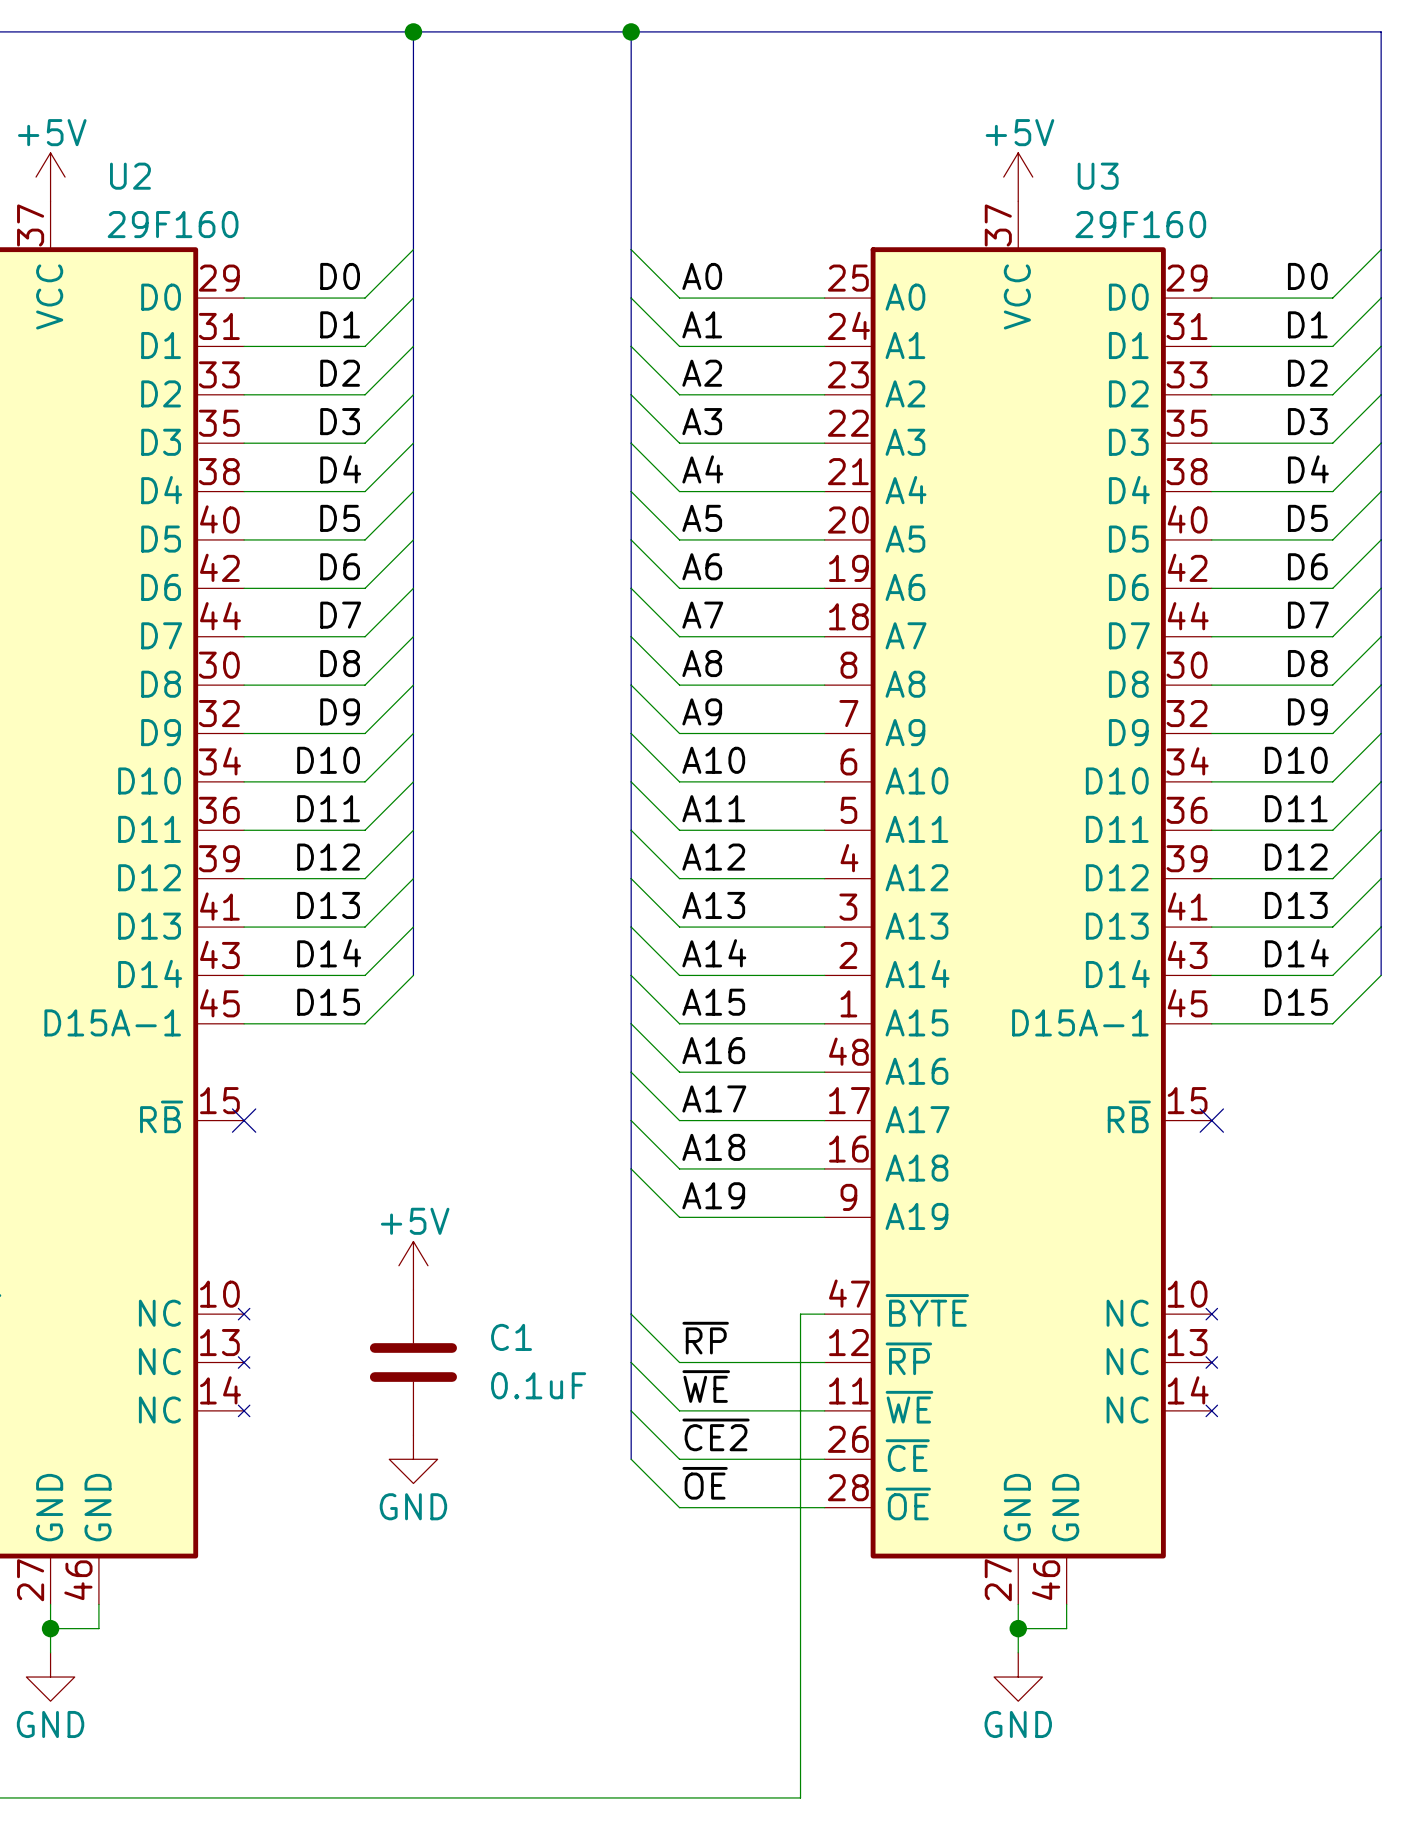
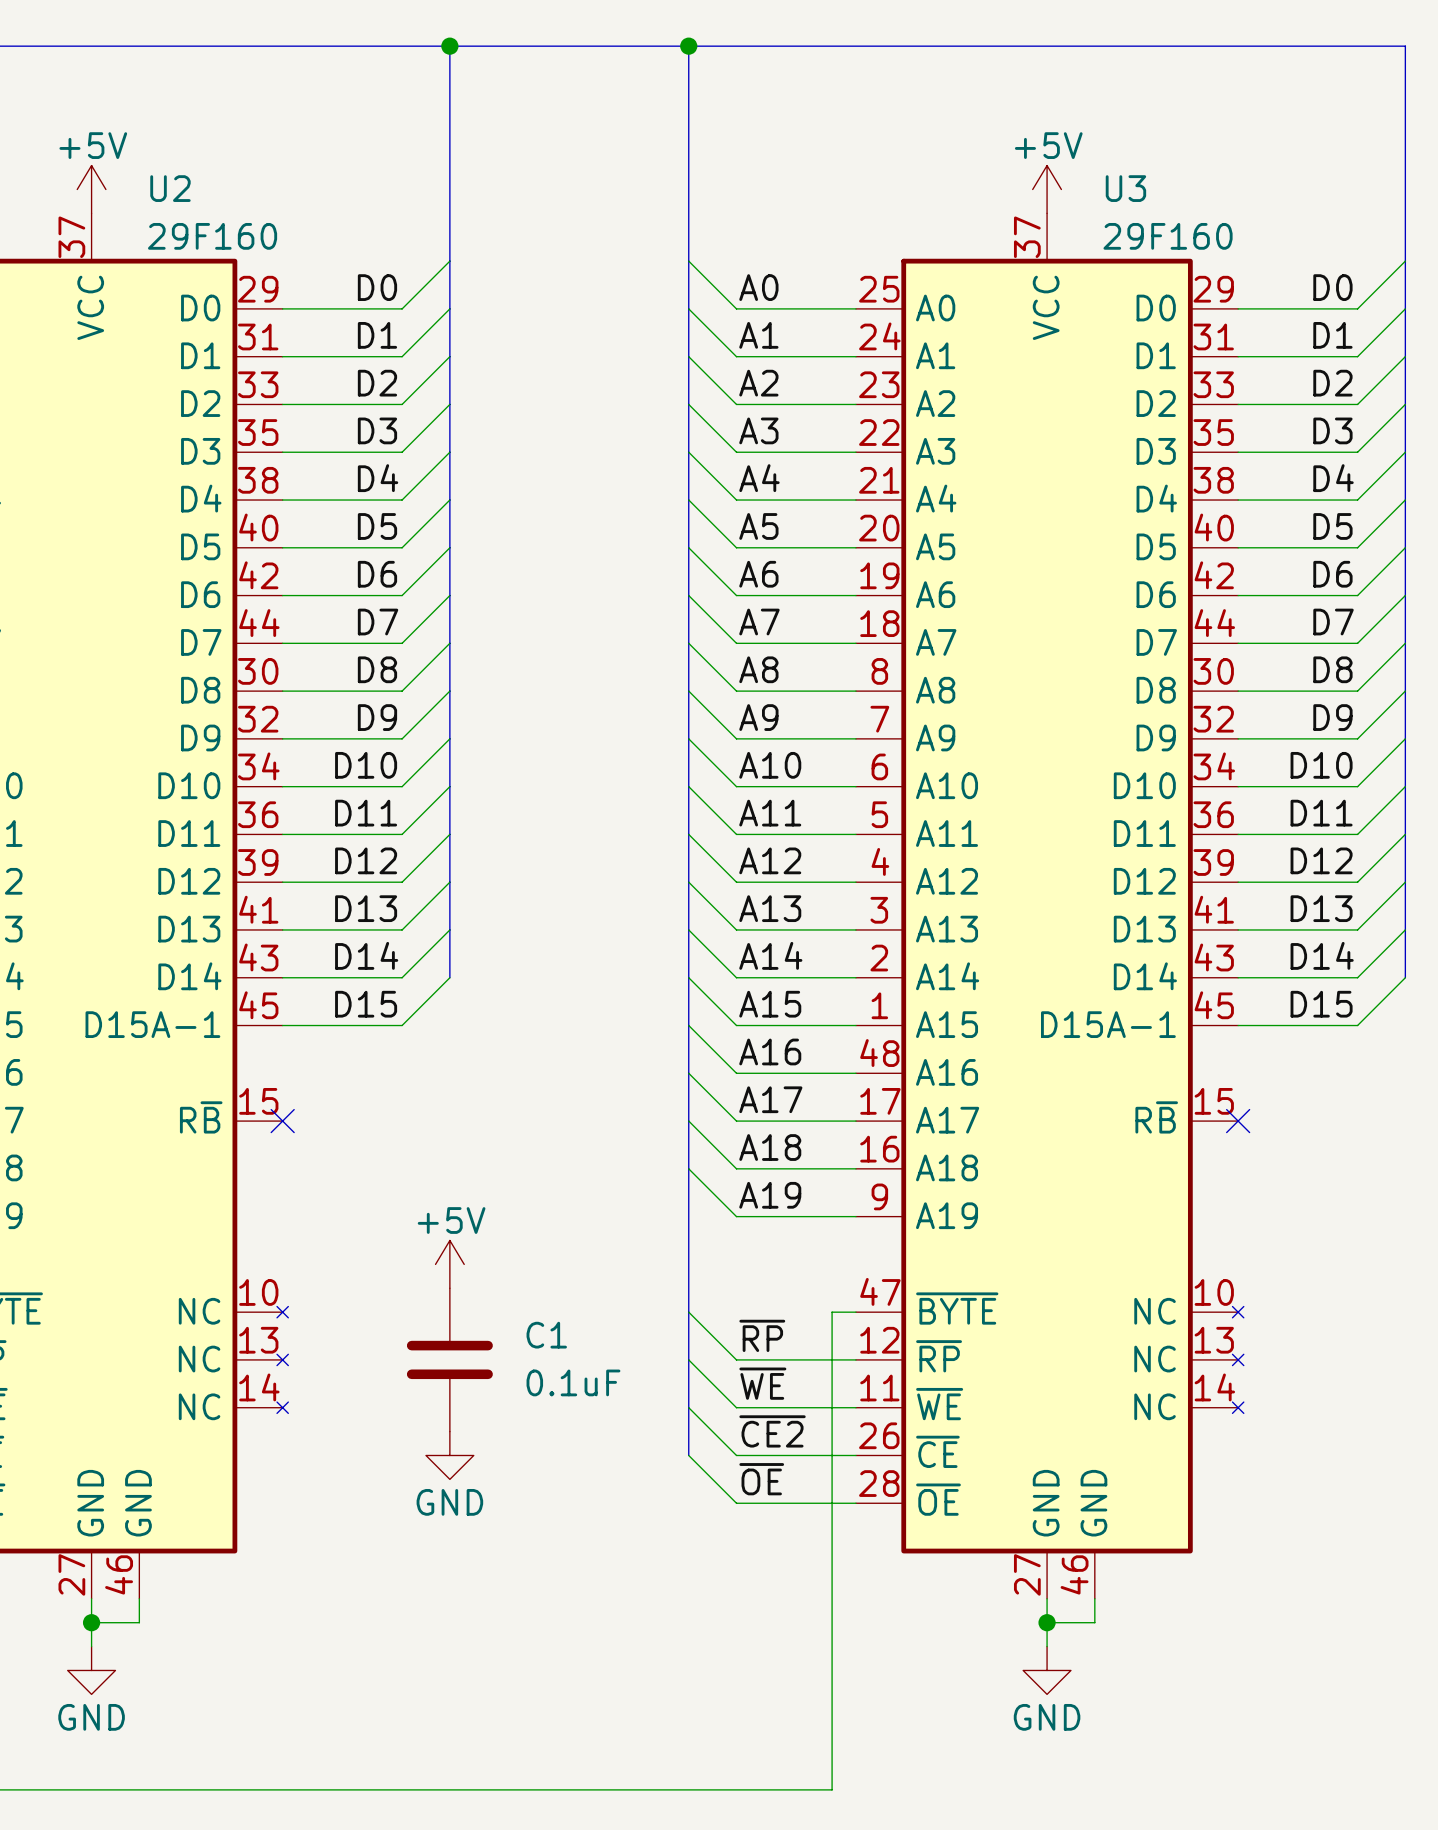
bus: (631, 31) (631, 1459) -> (688, 46) (688, 1455)
junction position: (631, 31) -> (688, 46)
wire: (631, 249) (679, 298) (703, 298) -> (688, 261) (736, 308)
label position: A0 (702, 276) -> A0 (758, 287)
wire: (631, 298) (679, 346) (703, 346) -> (688, 308) (736, 356)
label position: A1 (702, 324) -> A1 (758, 335)
wire: (631, 346) (679, 394) (703, 394) -> (688, 356) (736, 404)
label position: A2 (702, 373) -> A2 (758, 383)
wire: (631, 394) (679, 443) (703, 443) -> (688, 404) (736, 452)
label position: A3 (702, 421) -> A3 (758, 430)
wire: (631, 443) (679, 491) (703, 491) -> (688, 452) (736, 500)
label position: A4 (702, 469) -> A4 (759, 478)
wire: (631, 491) (679, 539) (703, 539) -> (688, 500) (736, 547)
label position: A5 (702, 518) -> A5 (758, 526)
wire: (631, 539) (679, 588) (703, 588) -> (688, 547) (736, 595)
label position: A6 (702, 566) -> A6 (758, 574)
wire: (631, 588) (679, 636) (703, 636) -> (688, 595) (736, 643)
label position: A7 (702, 615) -> A7 (759, 622)
wire: (631, 636) (679, 685) (703, 685) -> (688, 643) (736, 691)
label position: A8 (702, 663) -> A8 (758, 669)
wire: (631, 685) (679, 733) (703, 733) -> (688, 691) (736, 738)
label position: A9 (702, 711) -> A9 (758, 717)
wire: (631, 733) (679, 781) (703, 781) -> (688, 738) (736, 786)
label position: A10 (713, 760) -> A10 (770, 765)
wire: (631, 781) (679, 830) (703, 830) -> (688, 786) (736, 834)
label position: A11 (713, 808) -> A11 (770, 813)
wire: (631, 830) (679, 878) (703, 878) -> (688, 834) (736, 882)
label position: A12 (713, 857) -> A12 (770, 860)
wire: (631, 878) (679, 927) (703, 927) -> (688, 882) (736, 929)
label position: A13 (713, 905) -> A13 (770, 908)
wire: (631, 927) (679, 975) (703, 975) -> (688, 929) (736, 977)
label position: A14 (714, 953) -> A14 (770, 955)
wire: (631, 975) (679, 1023) (703, 1023) -> (688, 977) (736, 1025)
label position: A15 (713, 1002) -> A15 (770, 1004)
wire: (631, 1023) (679, 1072) (703, 1072) -> (688, 1025) (736, 1073)
label position: A16 (713, 1050) -> A16 (770, 1051)
wire: (631, 1072) (679, 1120) (703, 1120) -> (688, 1073) (736, 1121)
label position: A17 (714, 1099) -> A17 (770, 1099)
wire: (631, 1120) (679, 1168) (703, 1168) -> (688, 1121) (736, 1168)
label position: A18 (713, 1147) -> A18 (770, 1147)
wire: (631, 1168) (679, 1217) (703, 1217) -> (688, 1168) (736, 1216)
label position: A19 (713, 1195) -> A19 (770, 1195)
wire: (631, 1314) (679, 1362) (703, 1362) -> (688, 1312) (736, 1359)
label position: ~{RP} (705, 1338) -> ~{RP} (762, 1335)
wire: (631, 1362) (679, 1410) (703, 1410) -> (688, 1359) (736, 1407)
label position: ~{WE} (706, 1386) -> ~{WE} (762, 1383)
wire: (631, 1410) (679, 1459) (703, 1459) -> (688, 1407) (736, 1455)
label position: ~{CE2} (716, 1434) -> ~{CE2} (772, 1431)
wire: (631, 1459) (679, 1507) (703, 1507) -> (688, 1455) (736, 1503)
label position: ~{OE} (705, 1483) -> ~{OE} (761, 1479)

